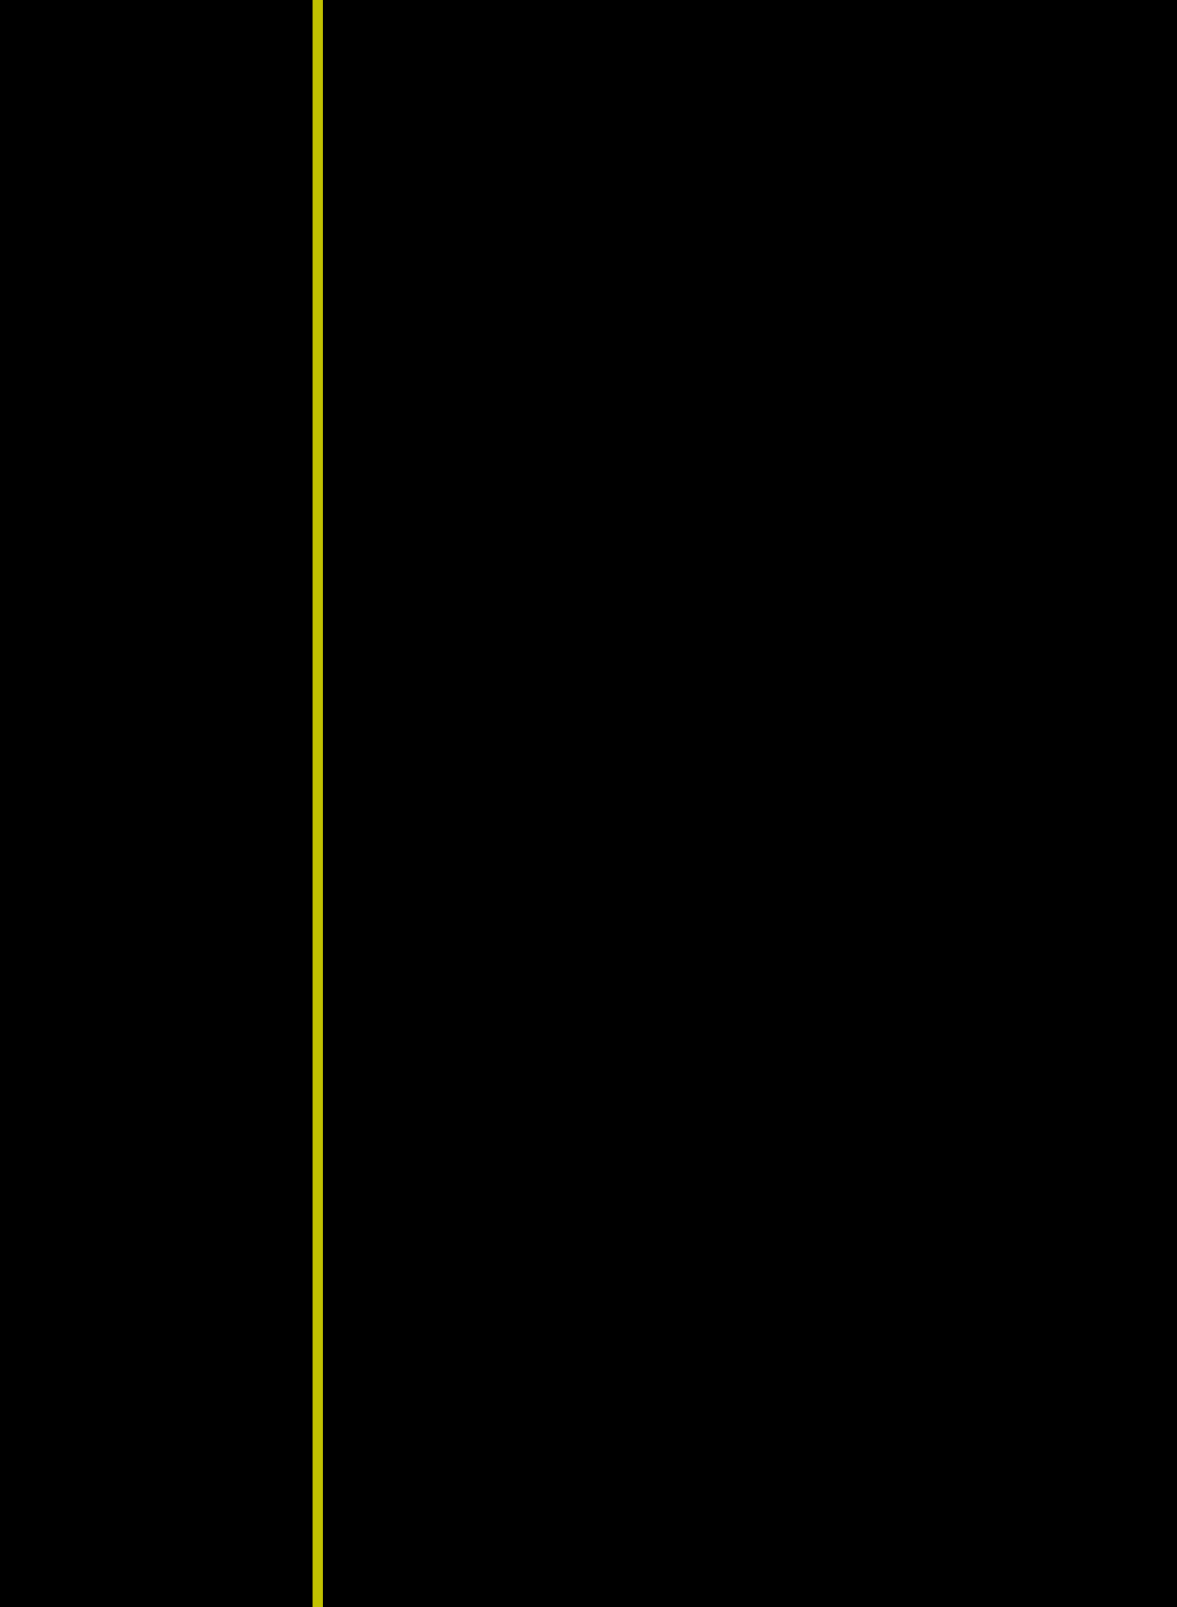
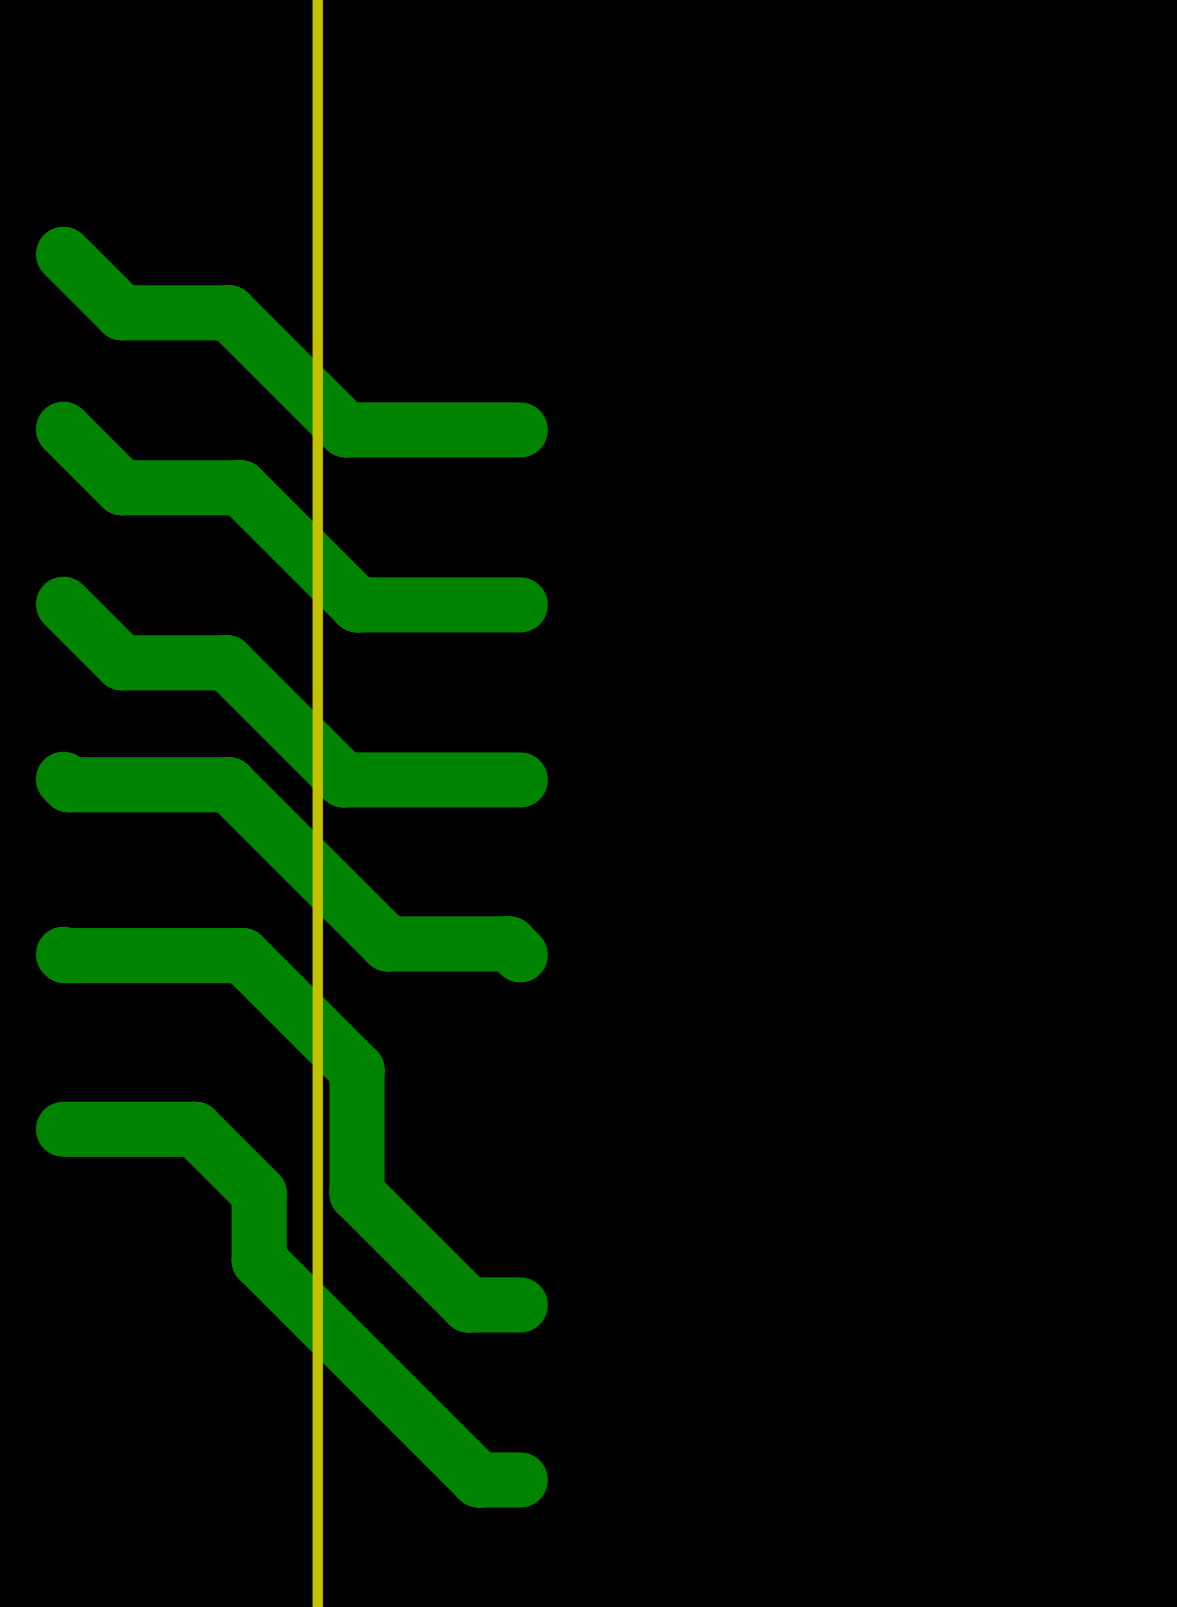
bottom track: none -> (63, 254) (122, 312) (228, 312) (345, 429) (520, 429)
bottom track: none -> (63, 429) (122, 487) (240, 487) (357, 604) (520, 604)
bottom track: none -> (63, 604) (122, 662) (226, 662) (343, 779) (520, 779)
bottom track: none -> (63, 779) (68, 784) (228, 784) (388, 943) (509, 943) (520, 954)
bottom track: none -> (63, 954) (242, 955) (357, 1070) (357, 1193) (468, 1304) (520, 1304)
bottom track: none -> (63, 1129) (195, 1129) (259, 1193) (259, 1260) (478, 1479) (520, 1479)

